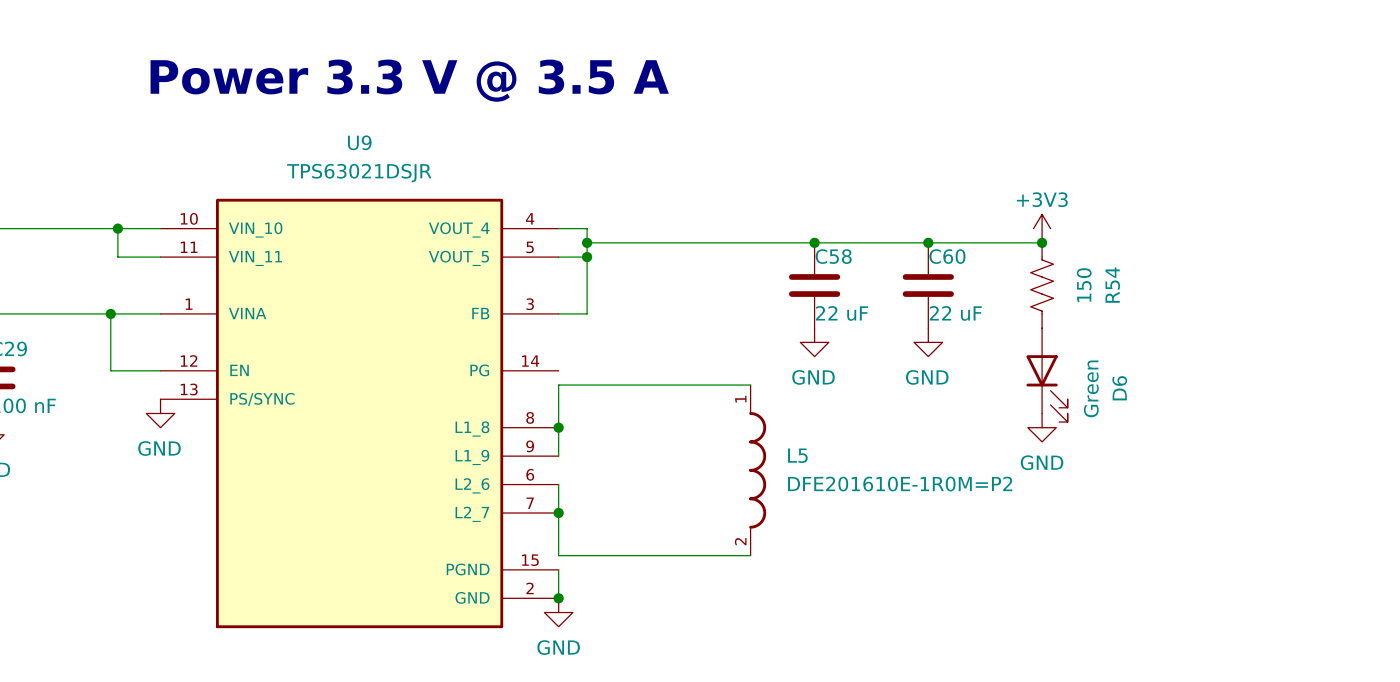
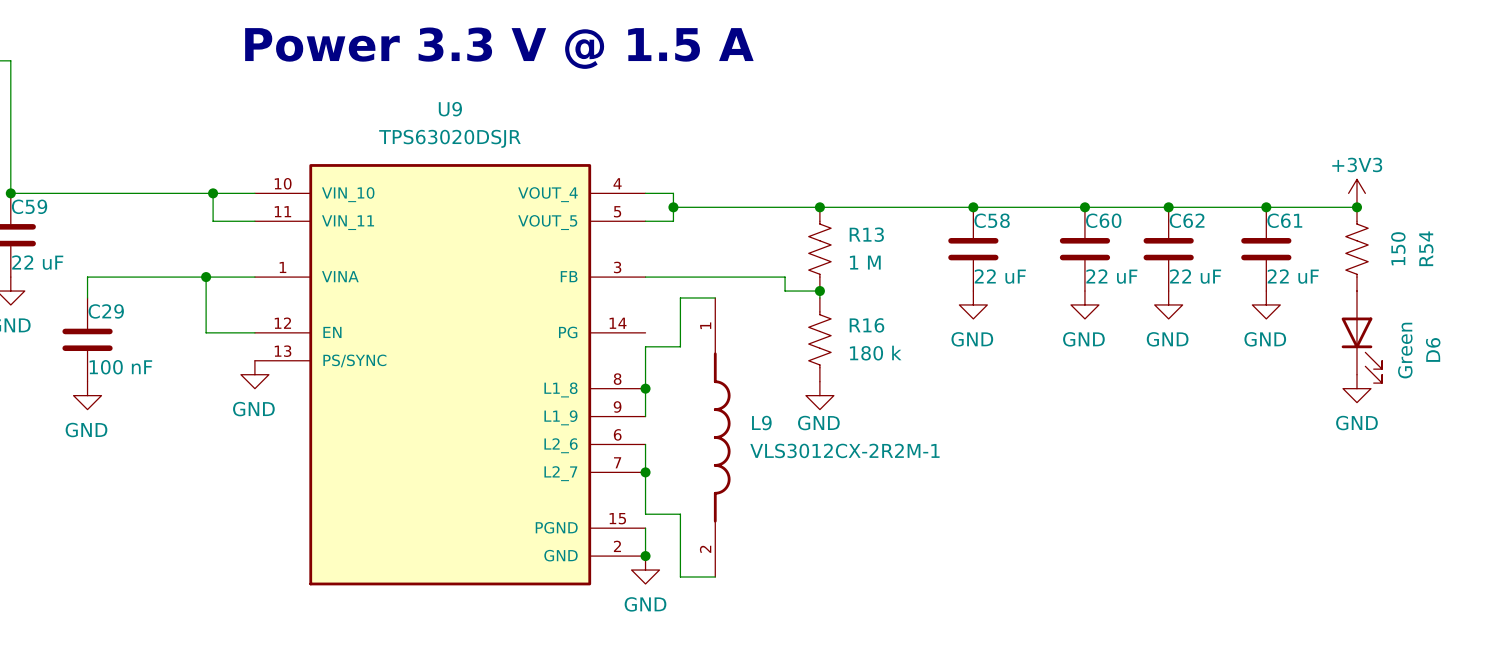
text: Power 3.3 V @ 3.5 A (409, 80) -> Power 3.3 V @ 1.5 A (499, 48)
U9 value: TPS63021DSJR (359, 173) -> TPS63020DSJR (449, 138)
power symbol position: +3V3 (1042, 228) -> +3V3 (1356, 193)
junction: none -> (819, 207)
junction: (814, 242) -> none
junction position: (928, 242) -> (973, 207)
junction: none -> (1084, 207)
wire: none -> (1119, 207) (1356, 207)
junction: (1042, 242) -> none
junction: none -> (1168, 207)
junction: none -> (1266, 207)
junction: none -> (1356, 207)
wire: (587, 257) (587, 313) -> (819, 297) (819, 291) (785, 291) (785, 277) (673, 277)
junction: (587, 257) -> none
R13: none -> 1 M (819, 249)
C58 position: (814, 285) -> (973, 249)
C60 position: (928, 285) -> (1084, 249)
R54 position: (1042, 285) -> (1356, 249)
C62: none -> 22 uF (1168, 249)
C61: none -> 22 uF (1266, 249)
junction: none -> (819, 291)
power symbol: GND (814, 342) -> none
power symbol position: GND (928, 342) -> GND (973, 304)
power symbol: none -> GND (1084, 304)
power symbol: none -> GND (1168, 304)
power symbol: none -> GND (1266, 304)
D6 position: (1047, 375) -> (1361, 337)
R16: none -> 180 k (819, 339)
wire: (594, 385) (750, 385) -> (680, 346) (680, 297) (715, 297)
power symbol: GND (1042, 427) -> none
power symbol: none -> GND (1356, 388)
power symbol: none -> GND (819, 395)
L5: DFE201610E-1R0M=P2 (757, 470) -> none
L9: none -> VLS3012CX-2R2M-1 (722, 437)
wire: (594, 555) (750, 555) -> (680, 514) (680, 576) (715, 576)

